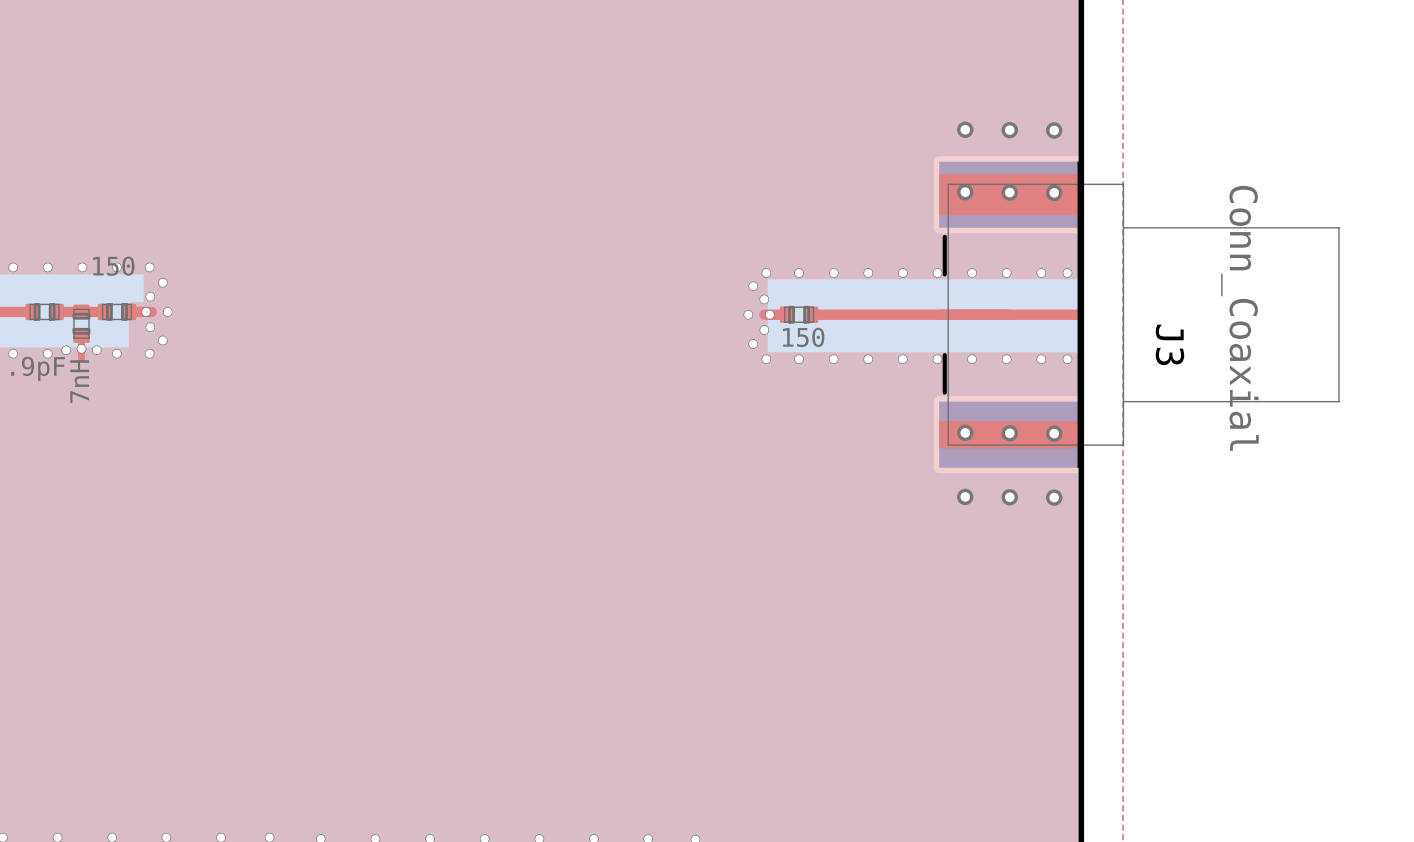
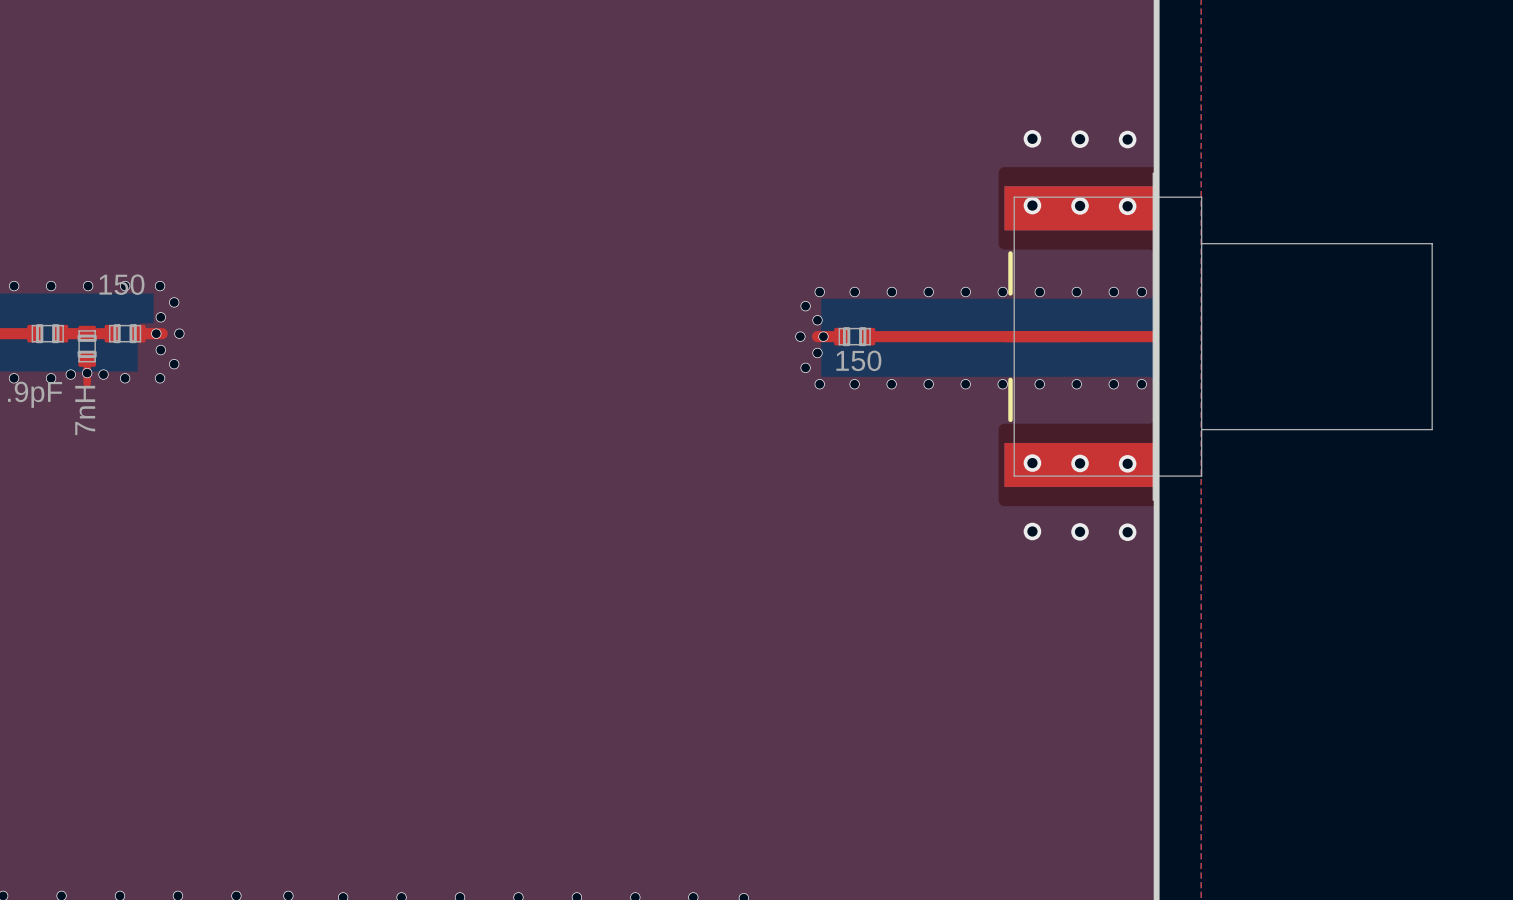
J3: Conn_Coaxial (1139, 314) -> none
part: none -> (1218, 336)

